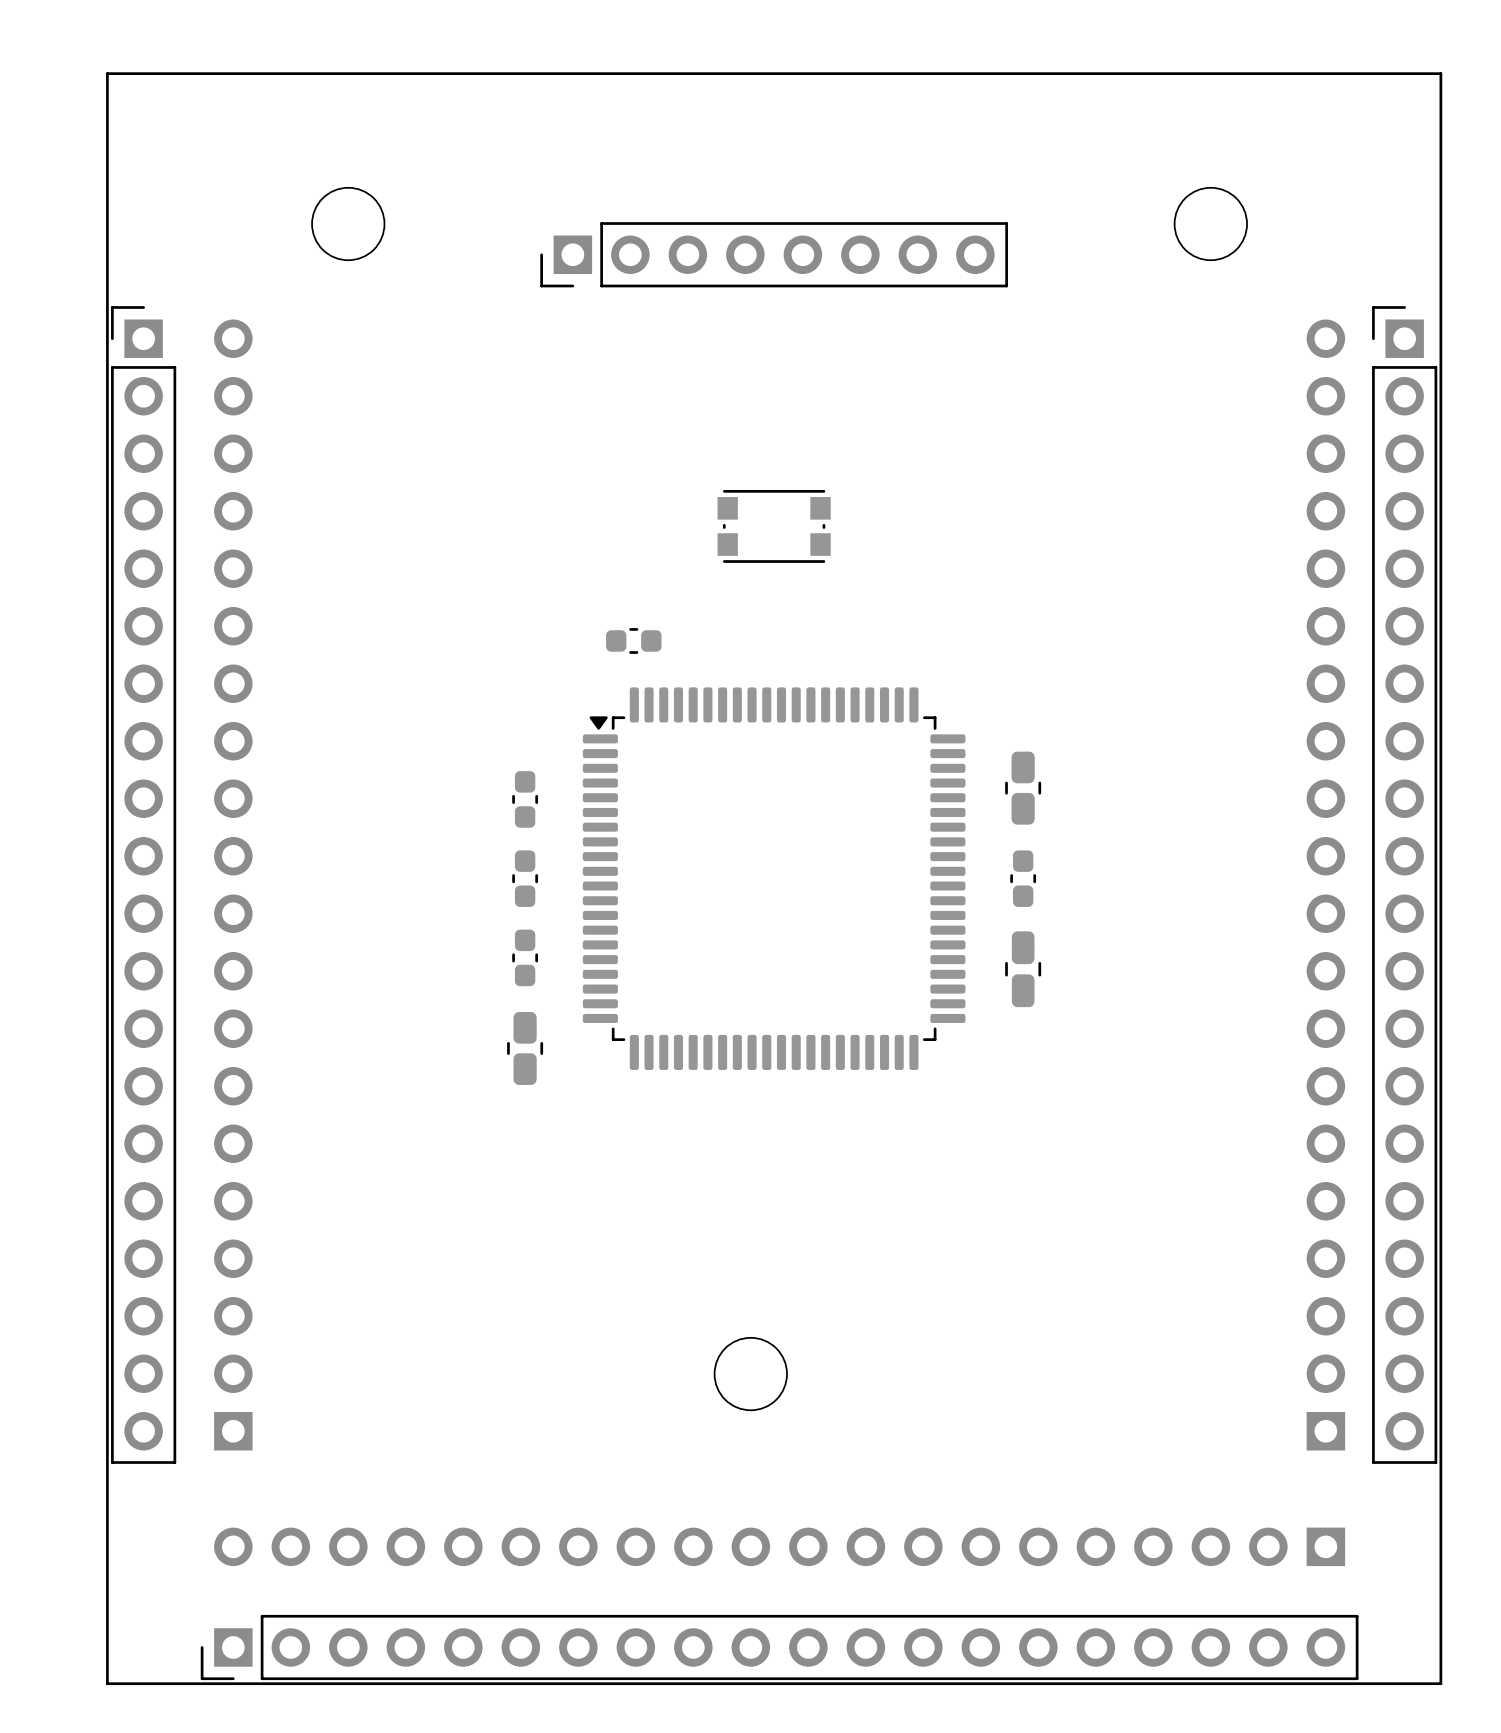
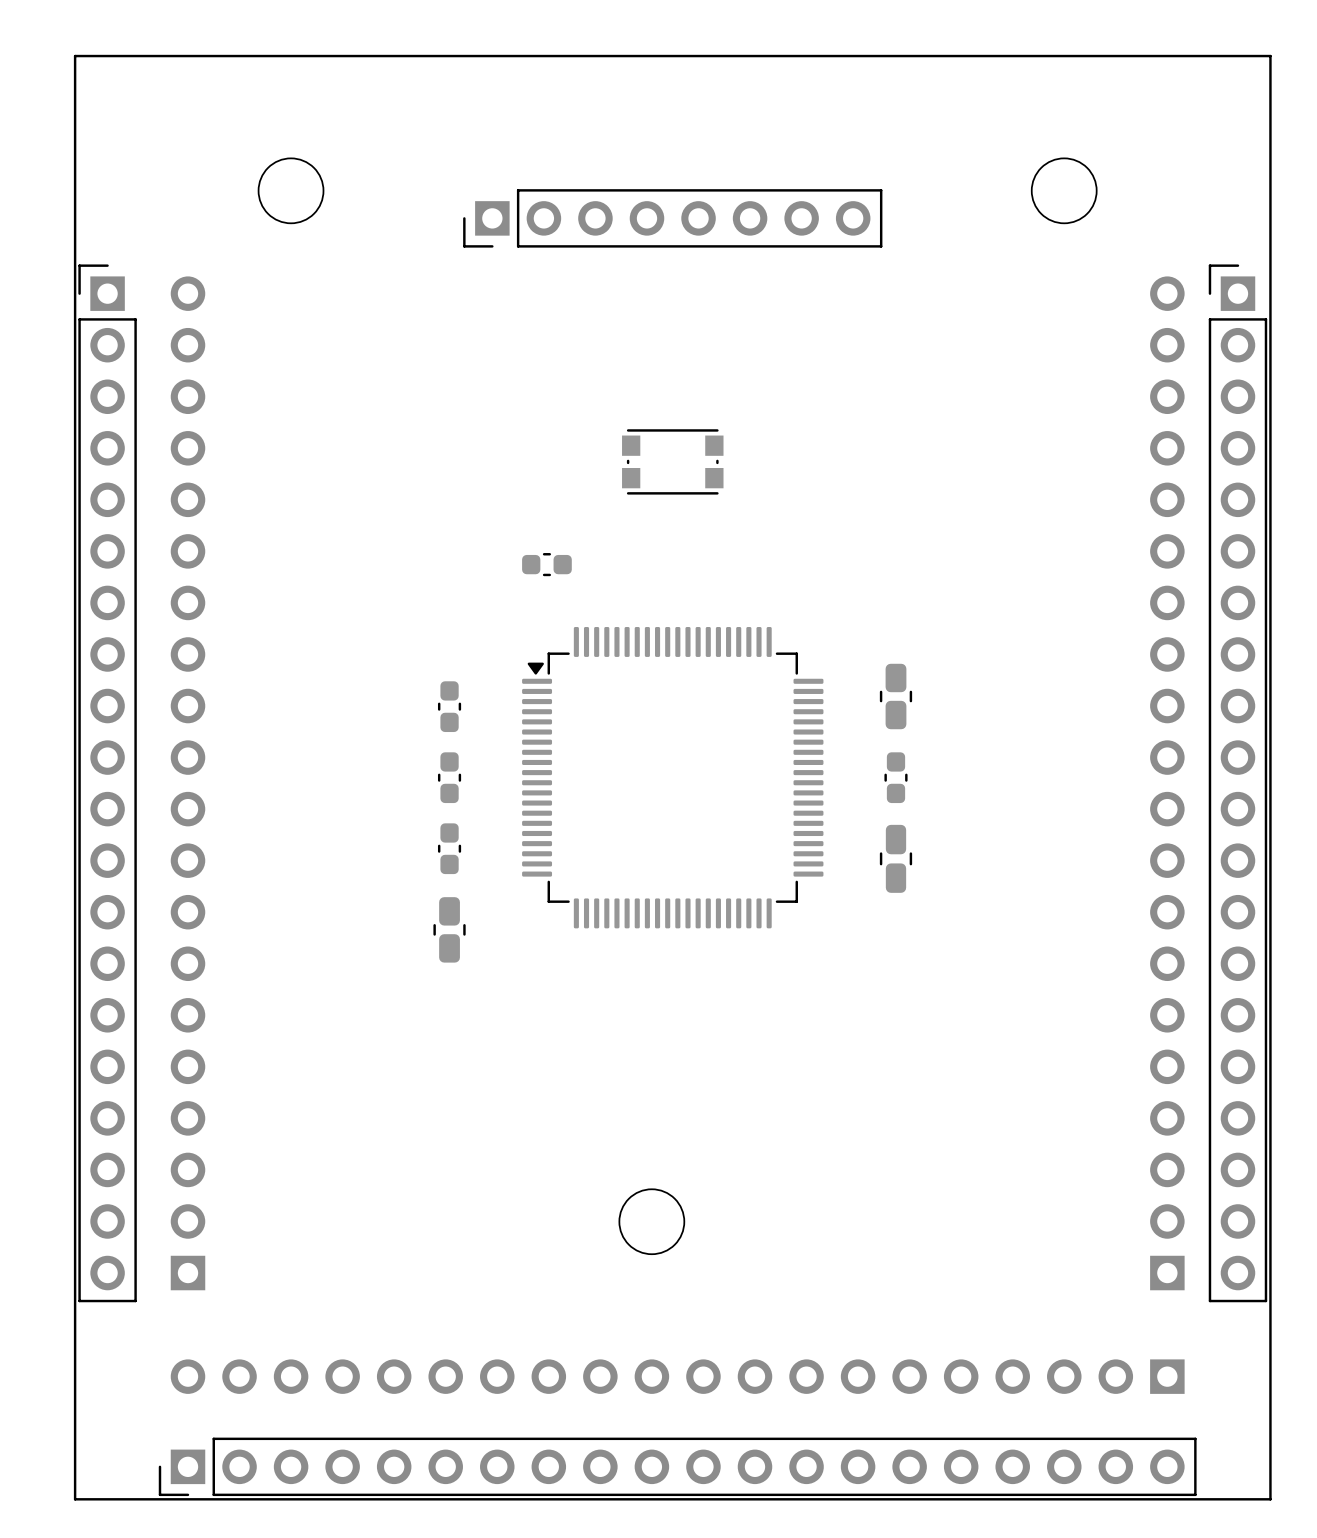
part footprint: [582, 687, 966, 1070] -> [522, 627, 824, 929]

